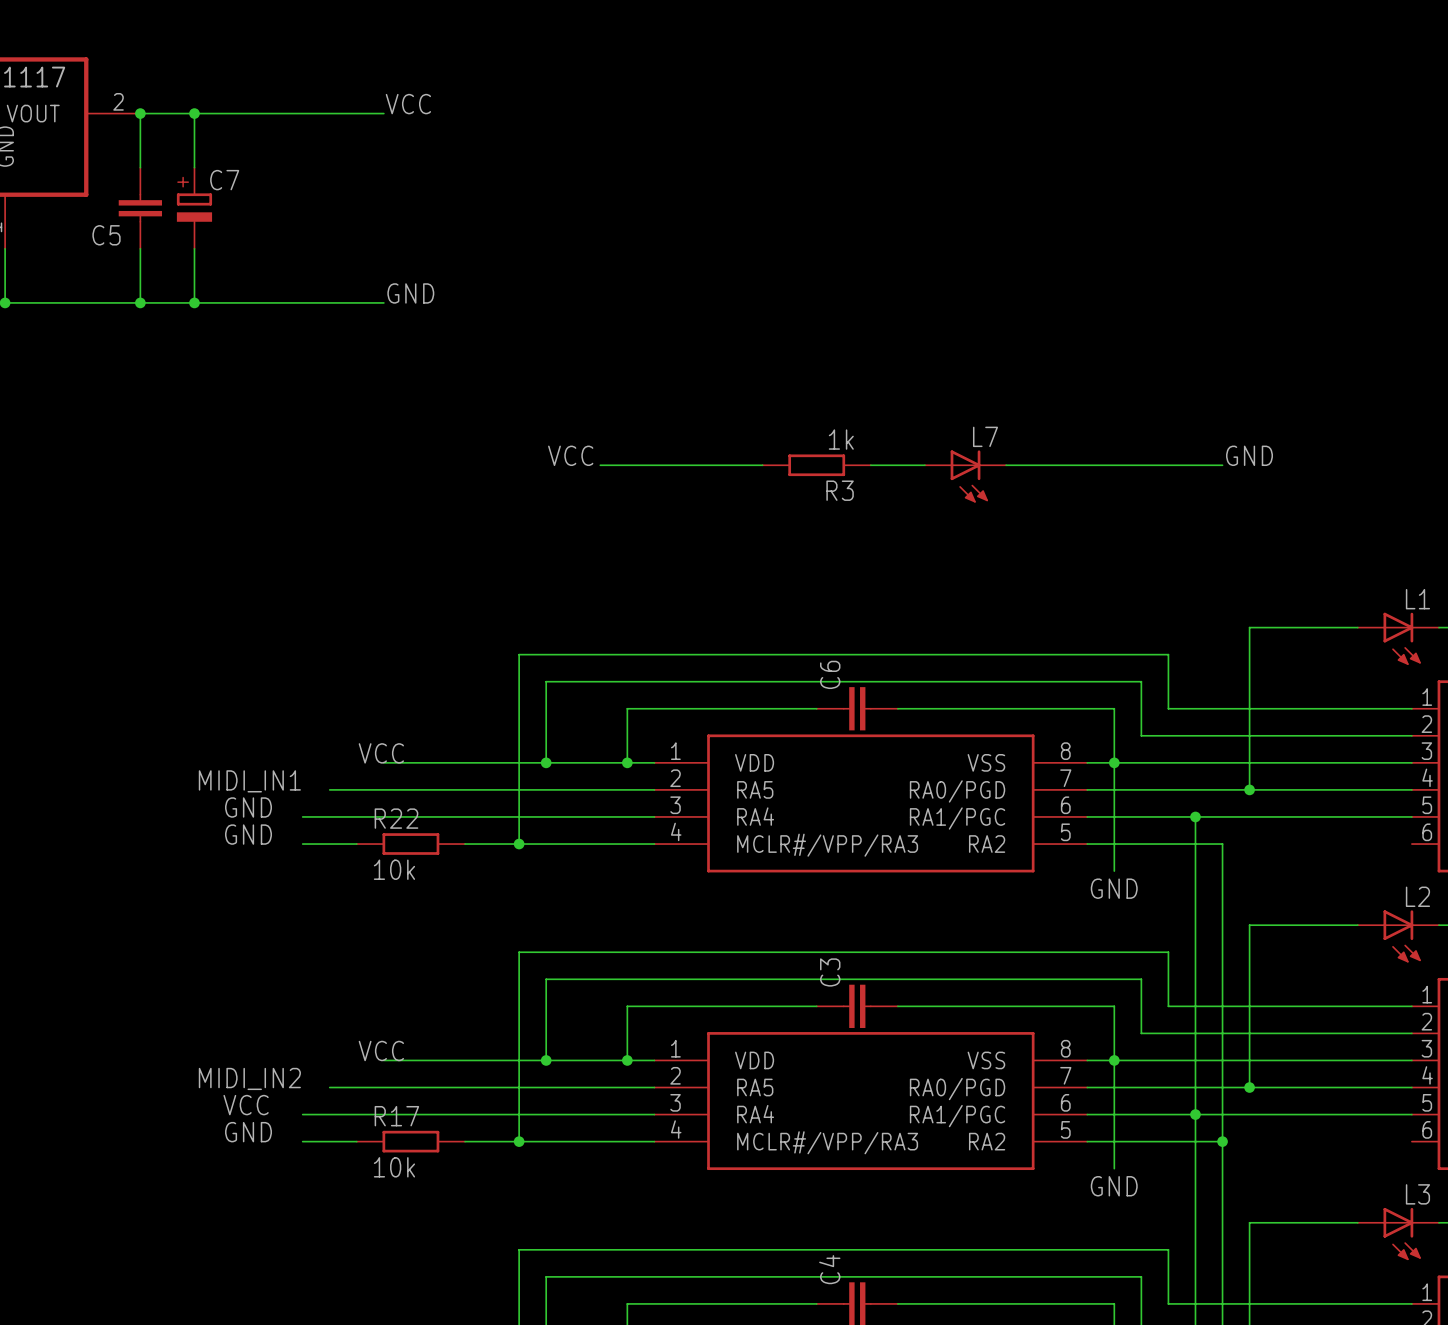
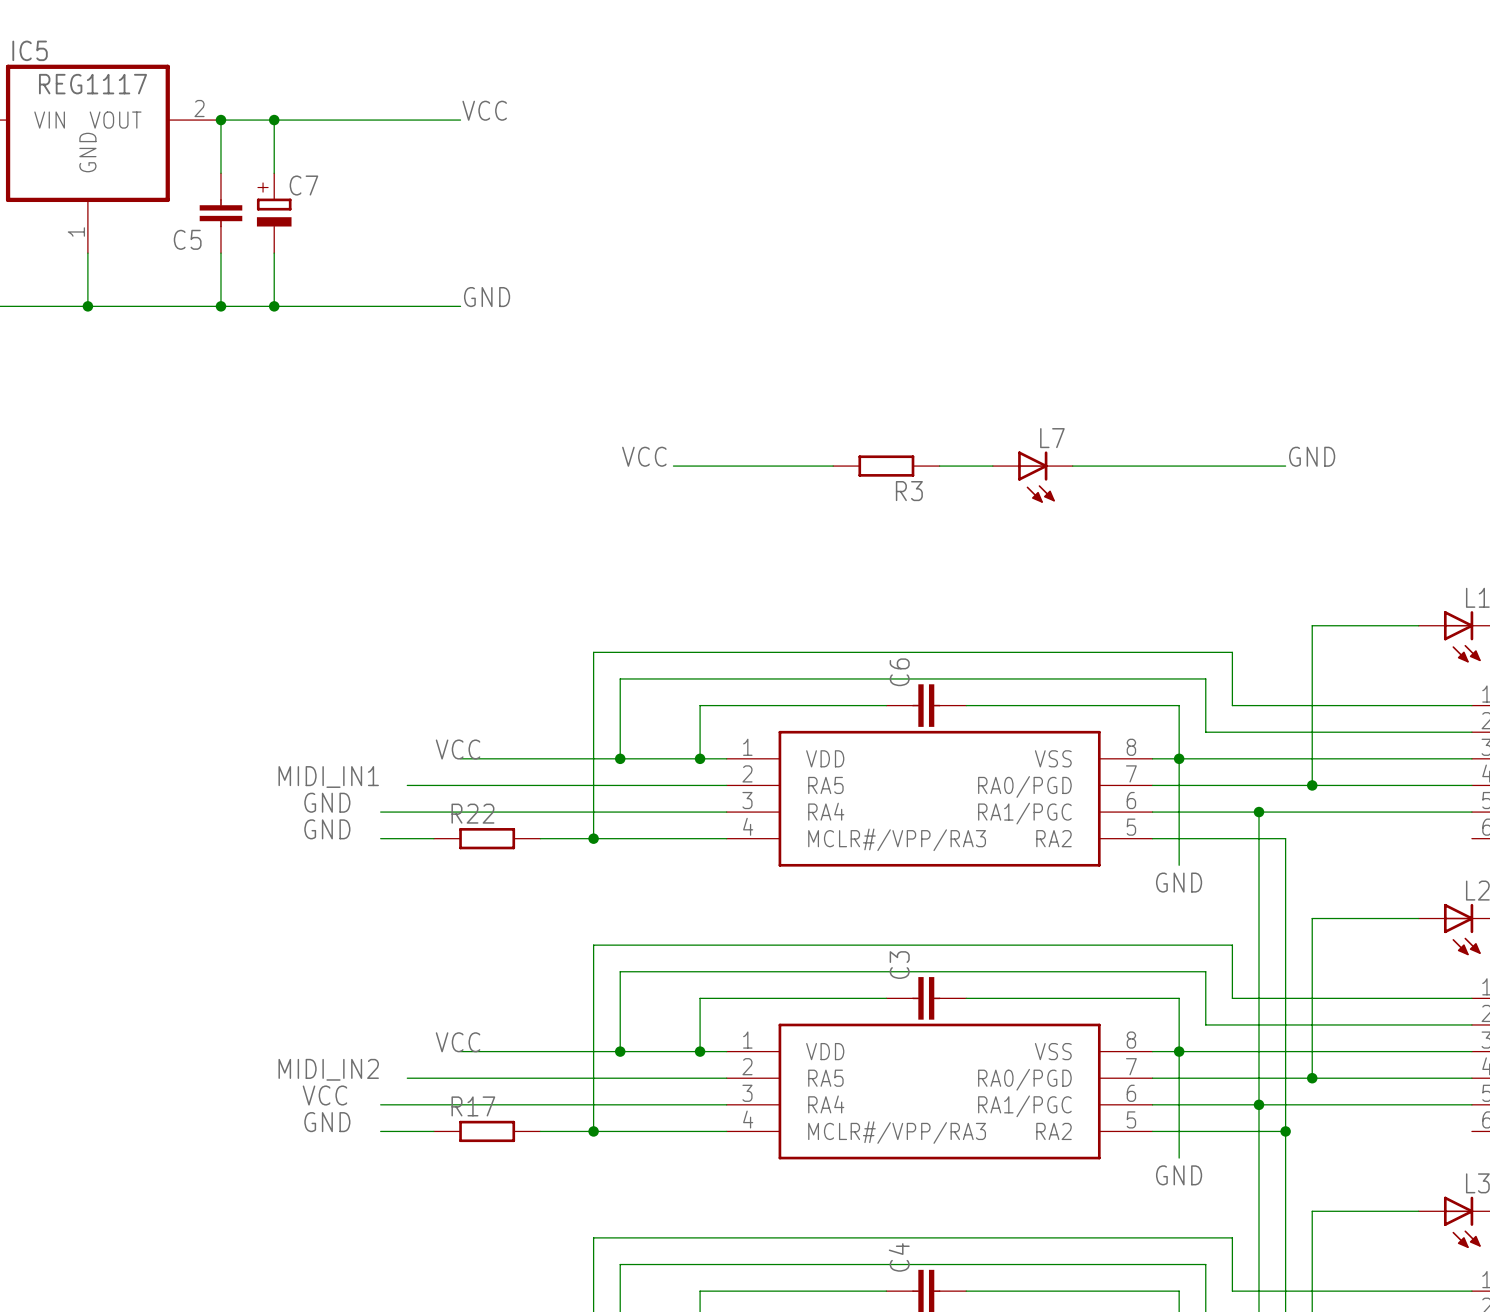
R3 value: 1k (841, 439) -> none
R22 value: 10k (394, 869) -> none
R17 value: 10k (394, 1167) -> none

